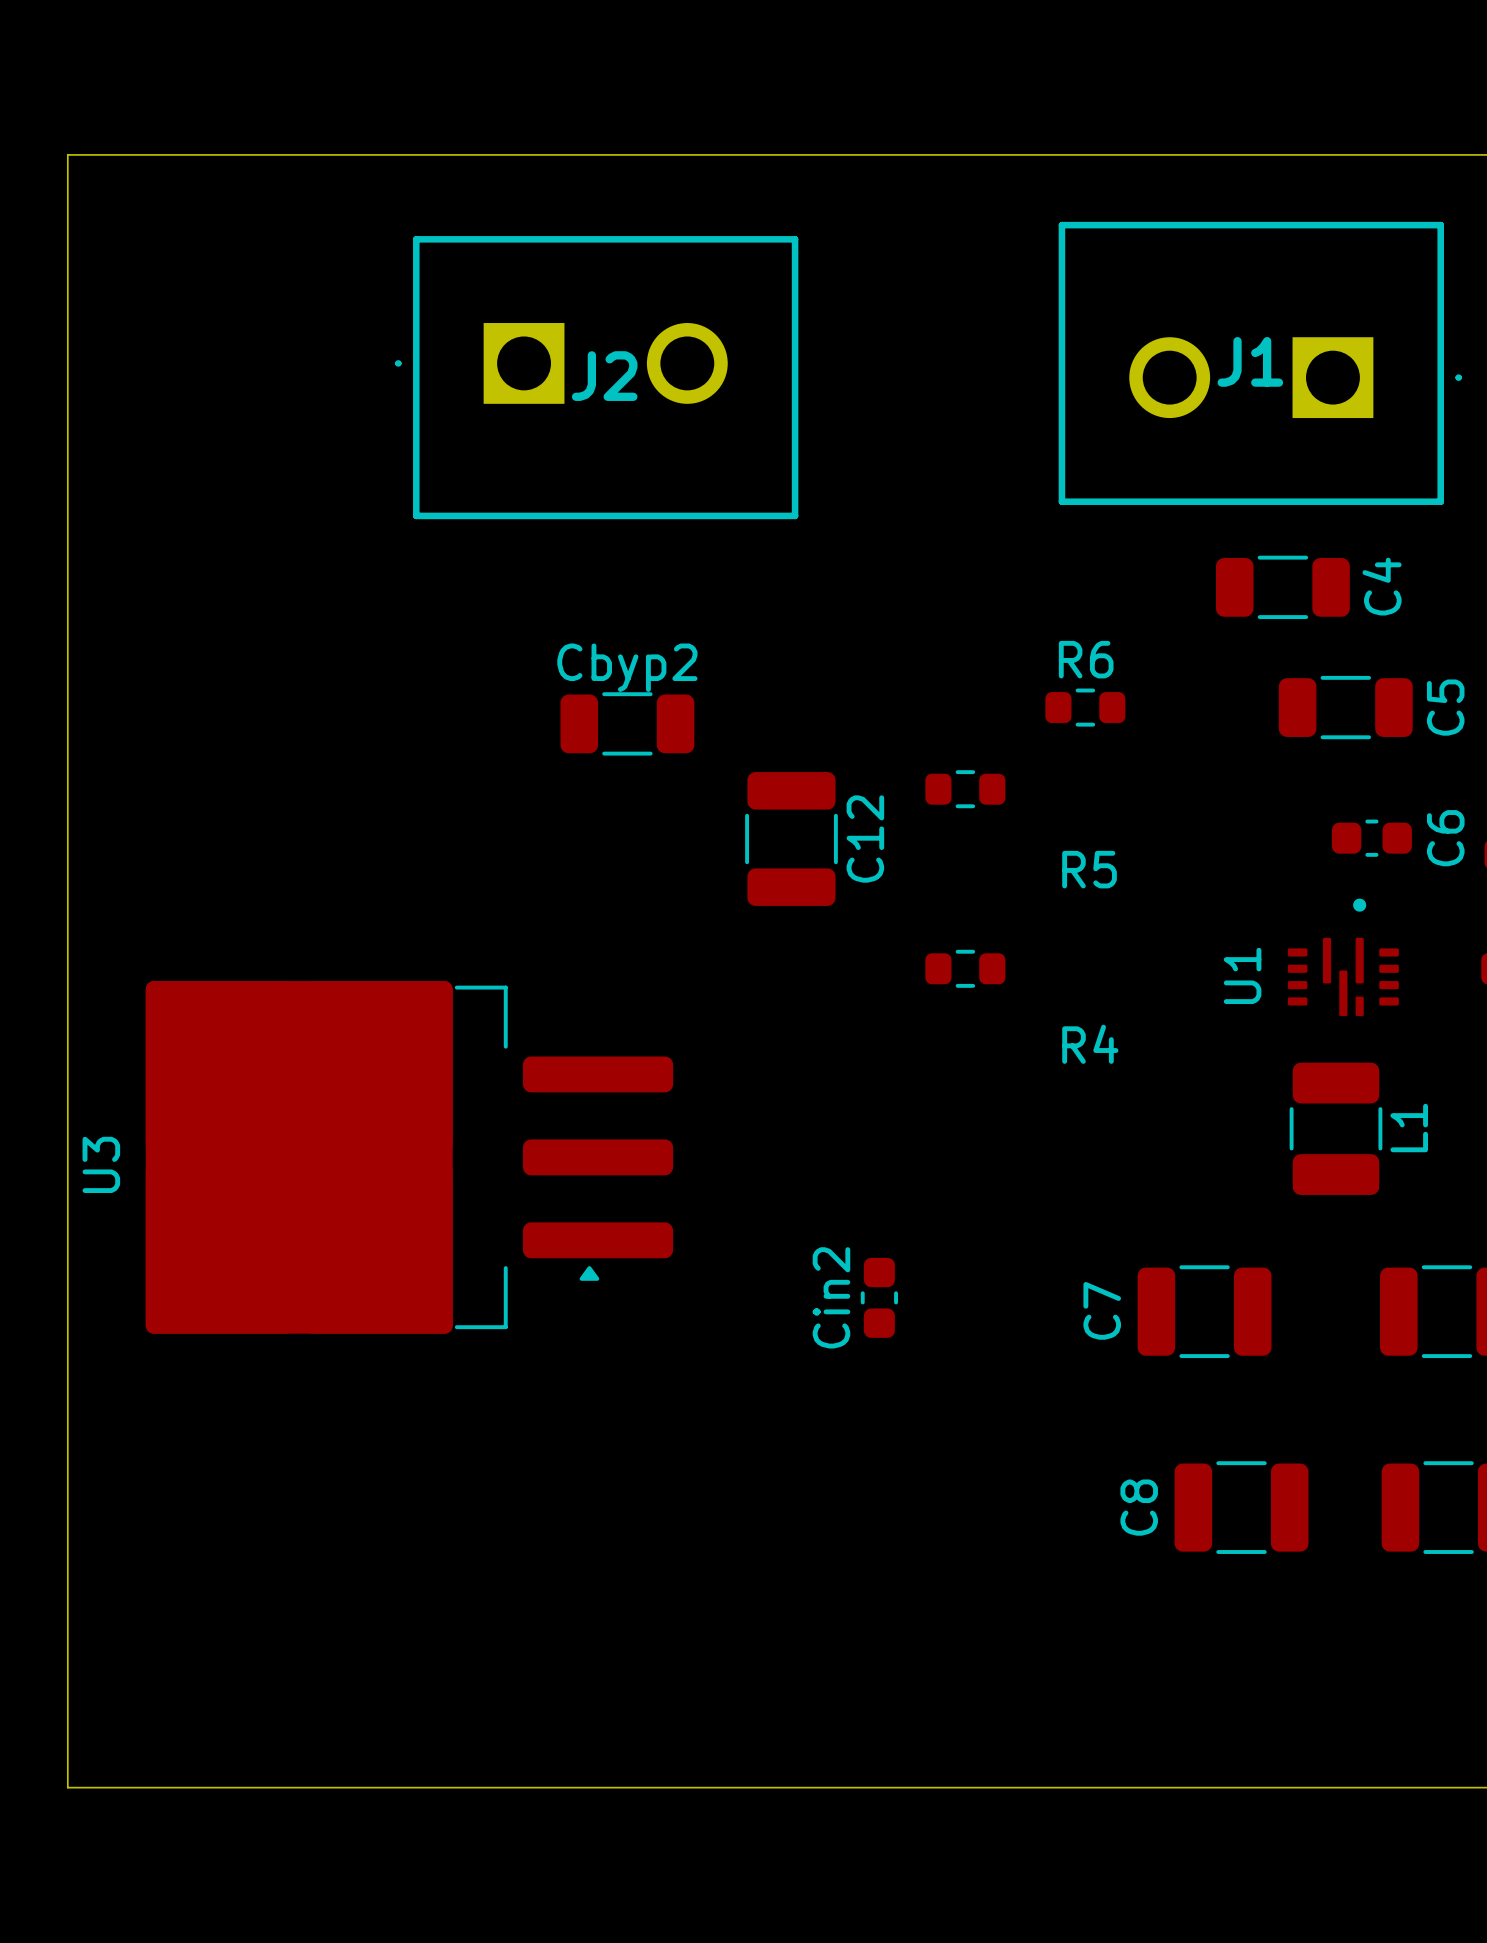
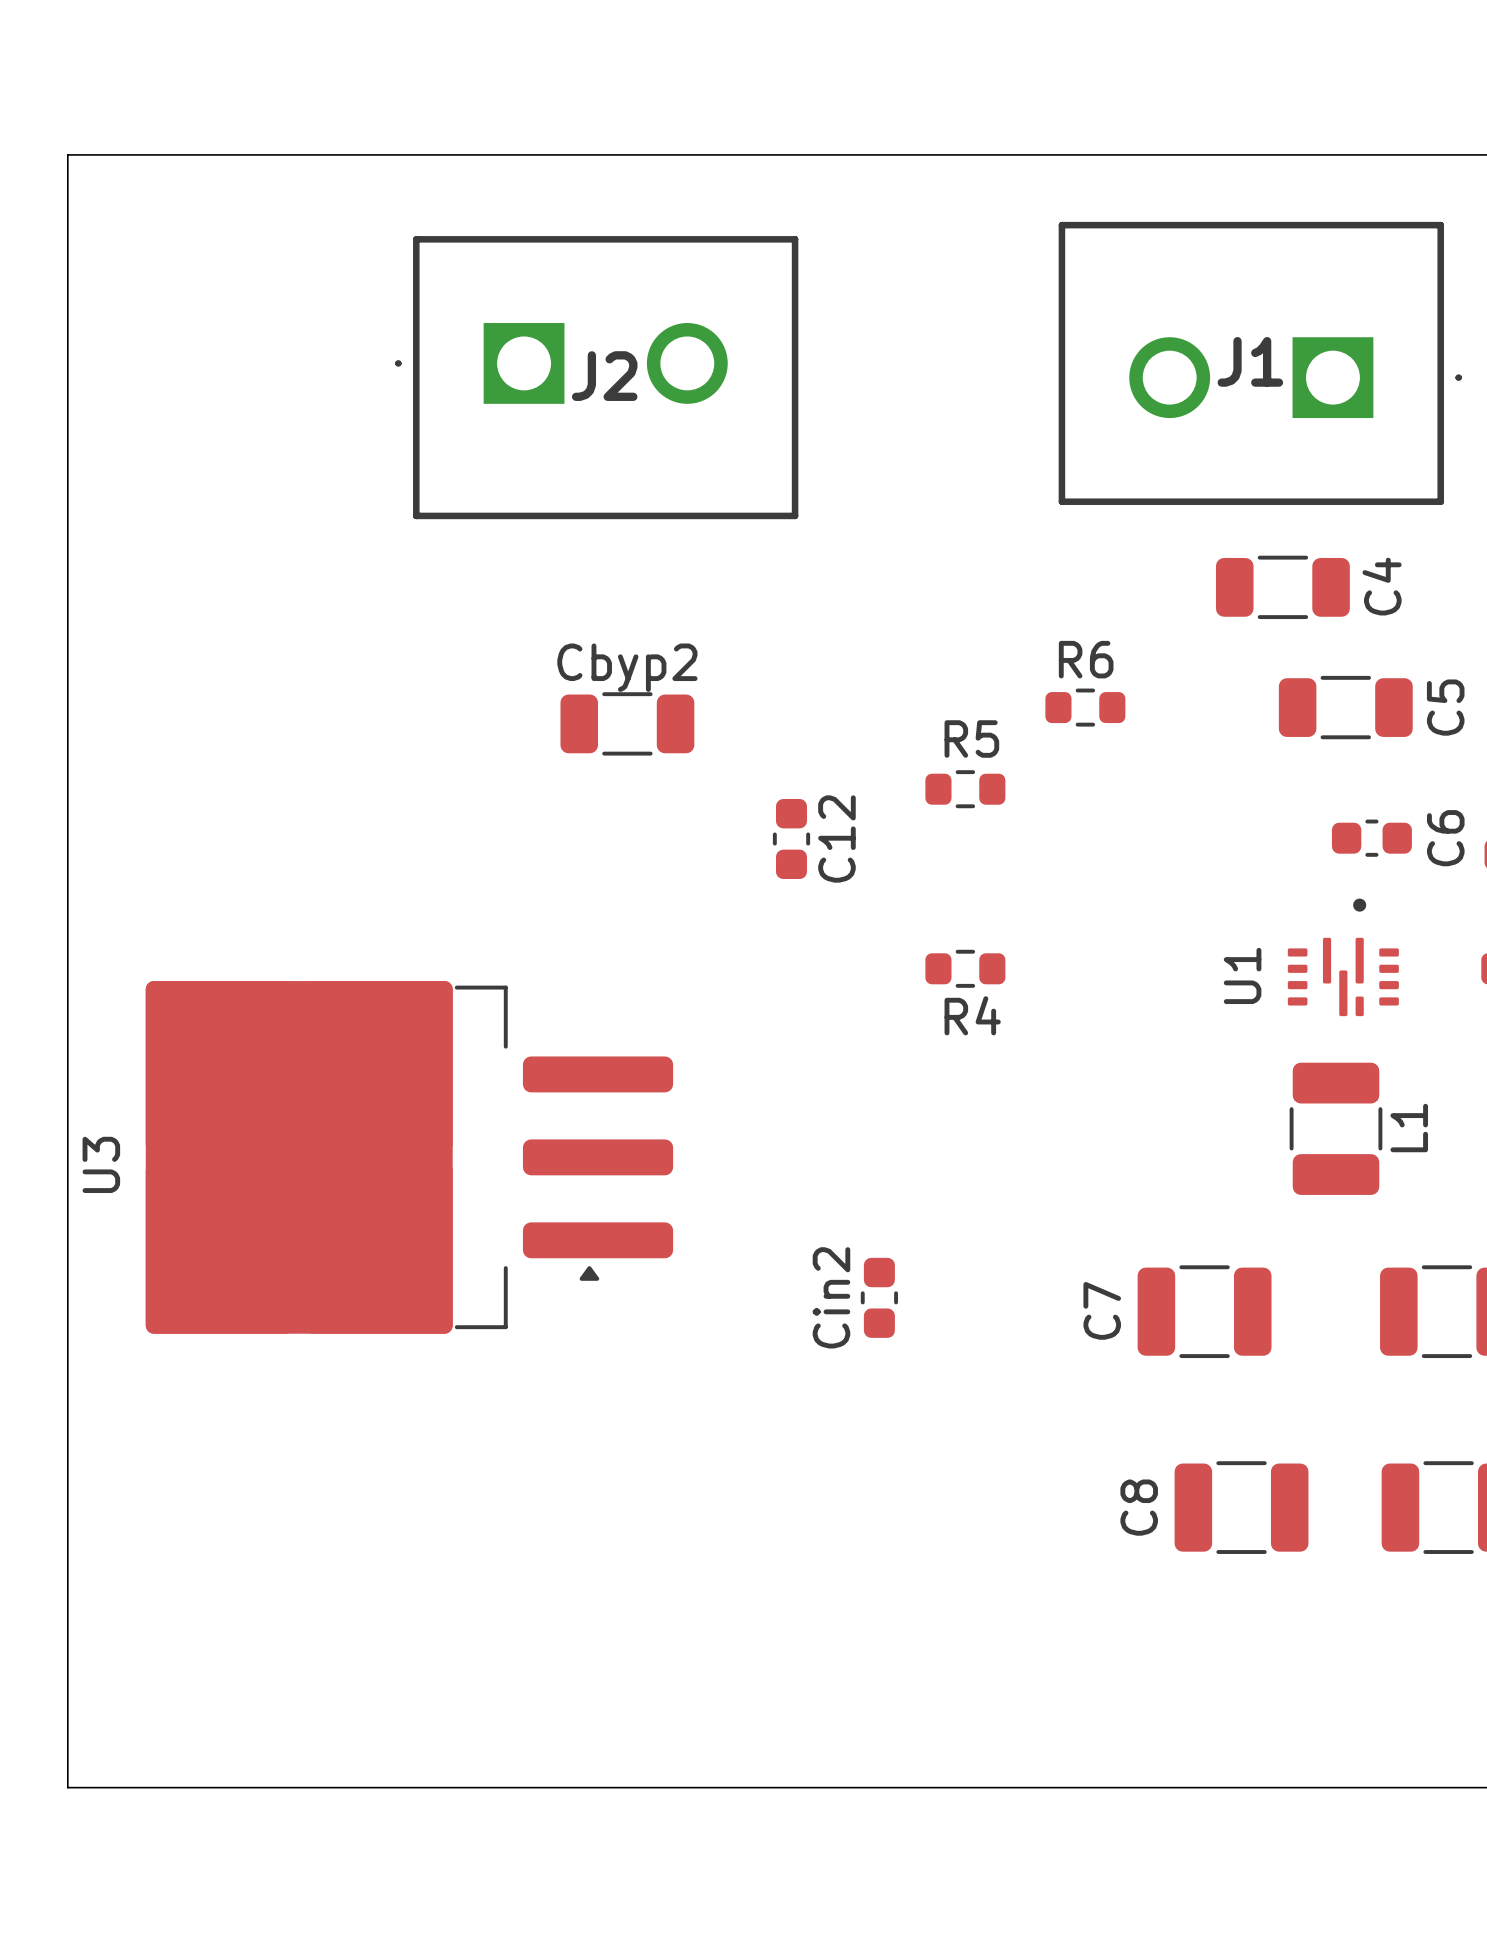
C12 footprint: [745, 772, 838, 906] -> [772, 799, 811, 880]
R5 name position: R5 (1089, 869) -> R5 (971, 739)
R4 name position: R4 (1090, 1044) -> R4 (972, 1015)

